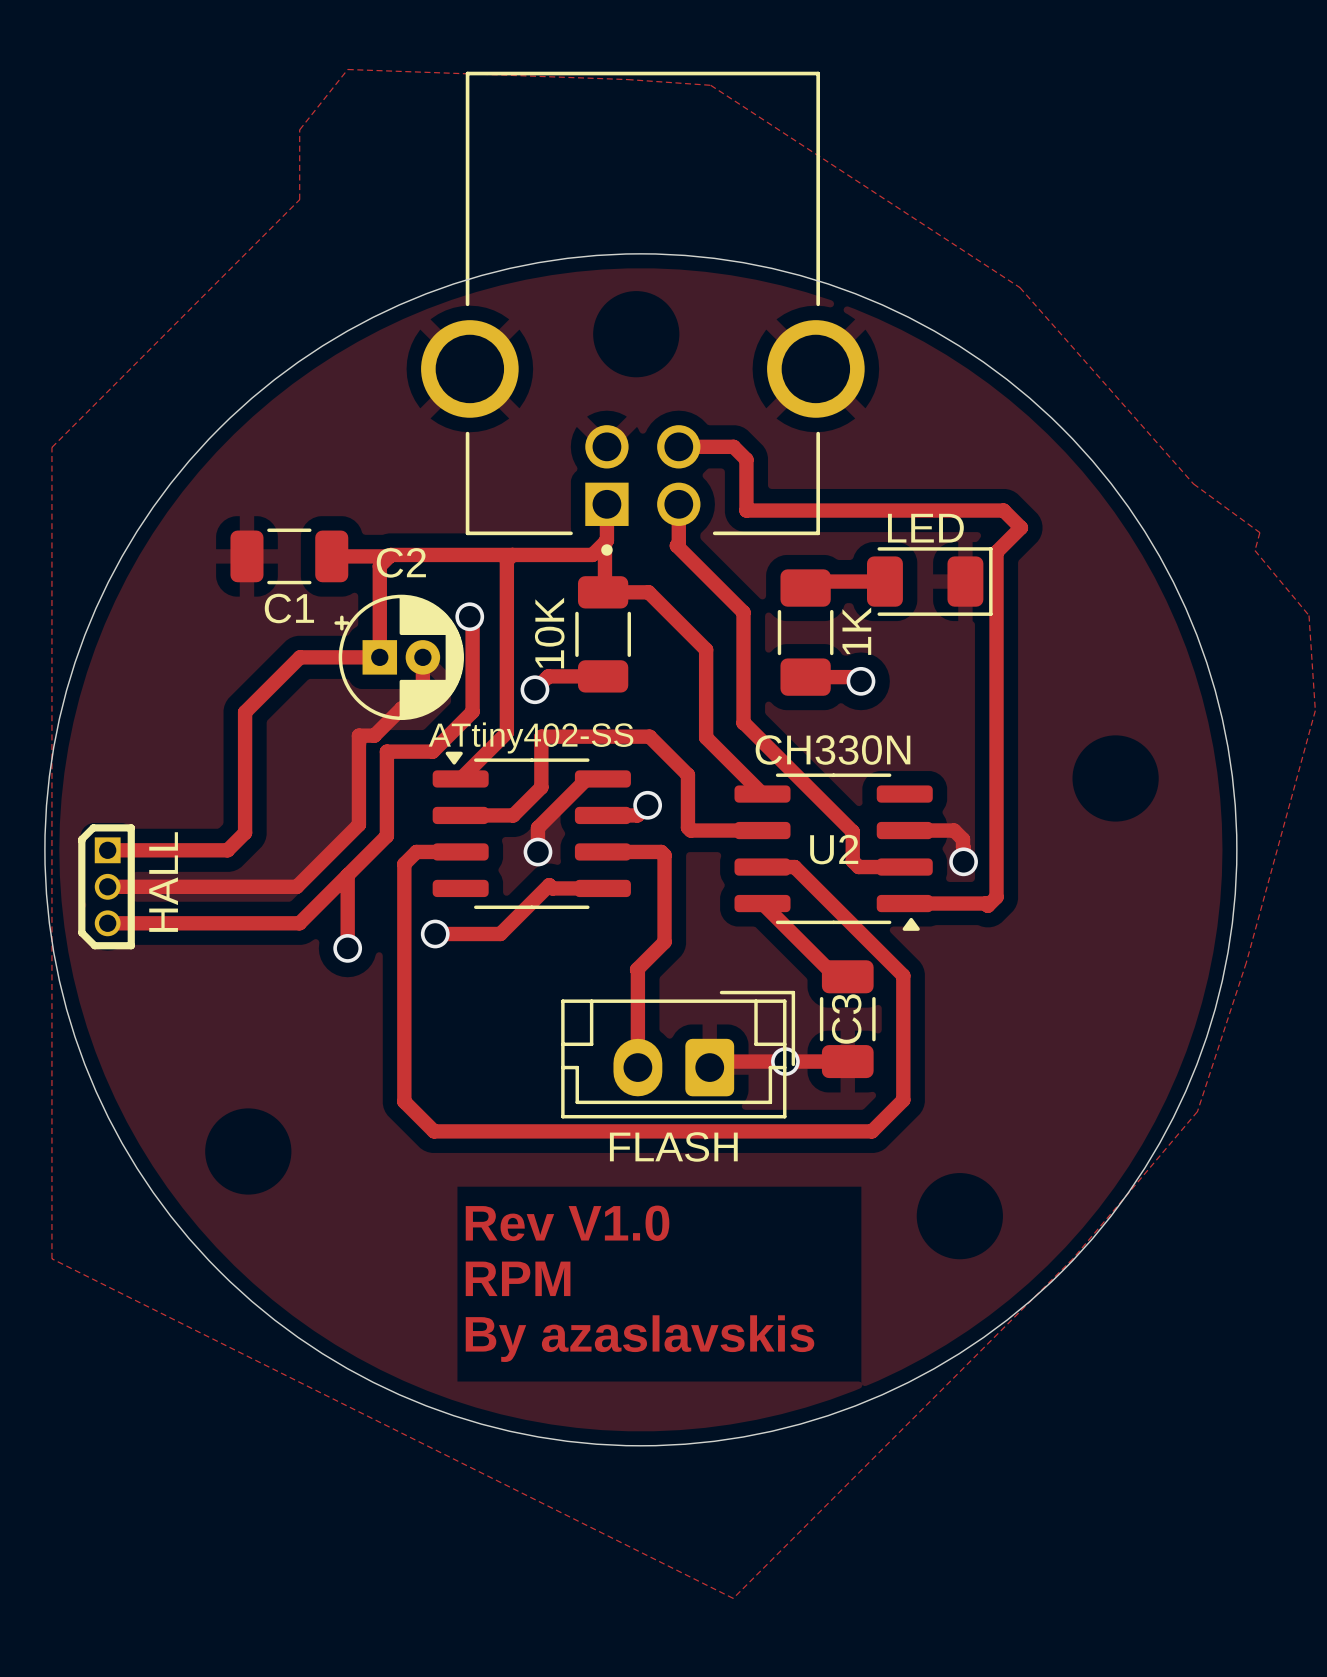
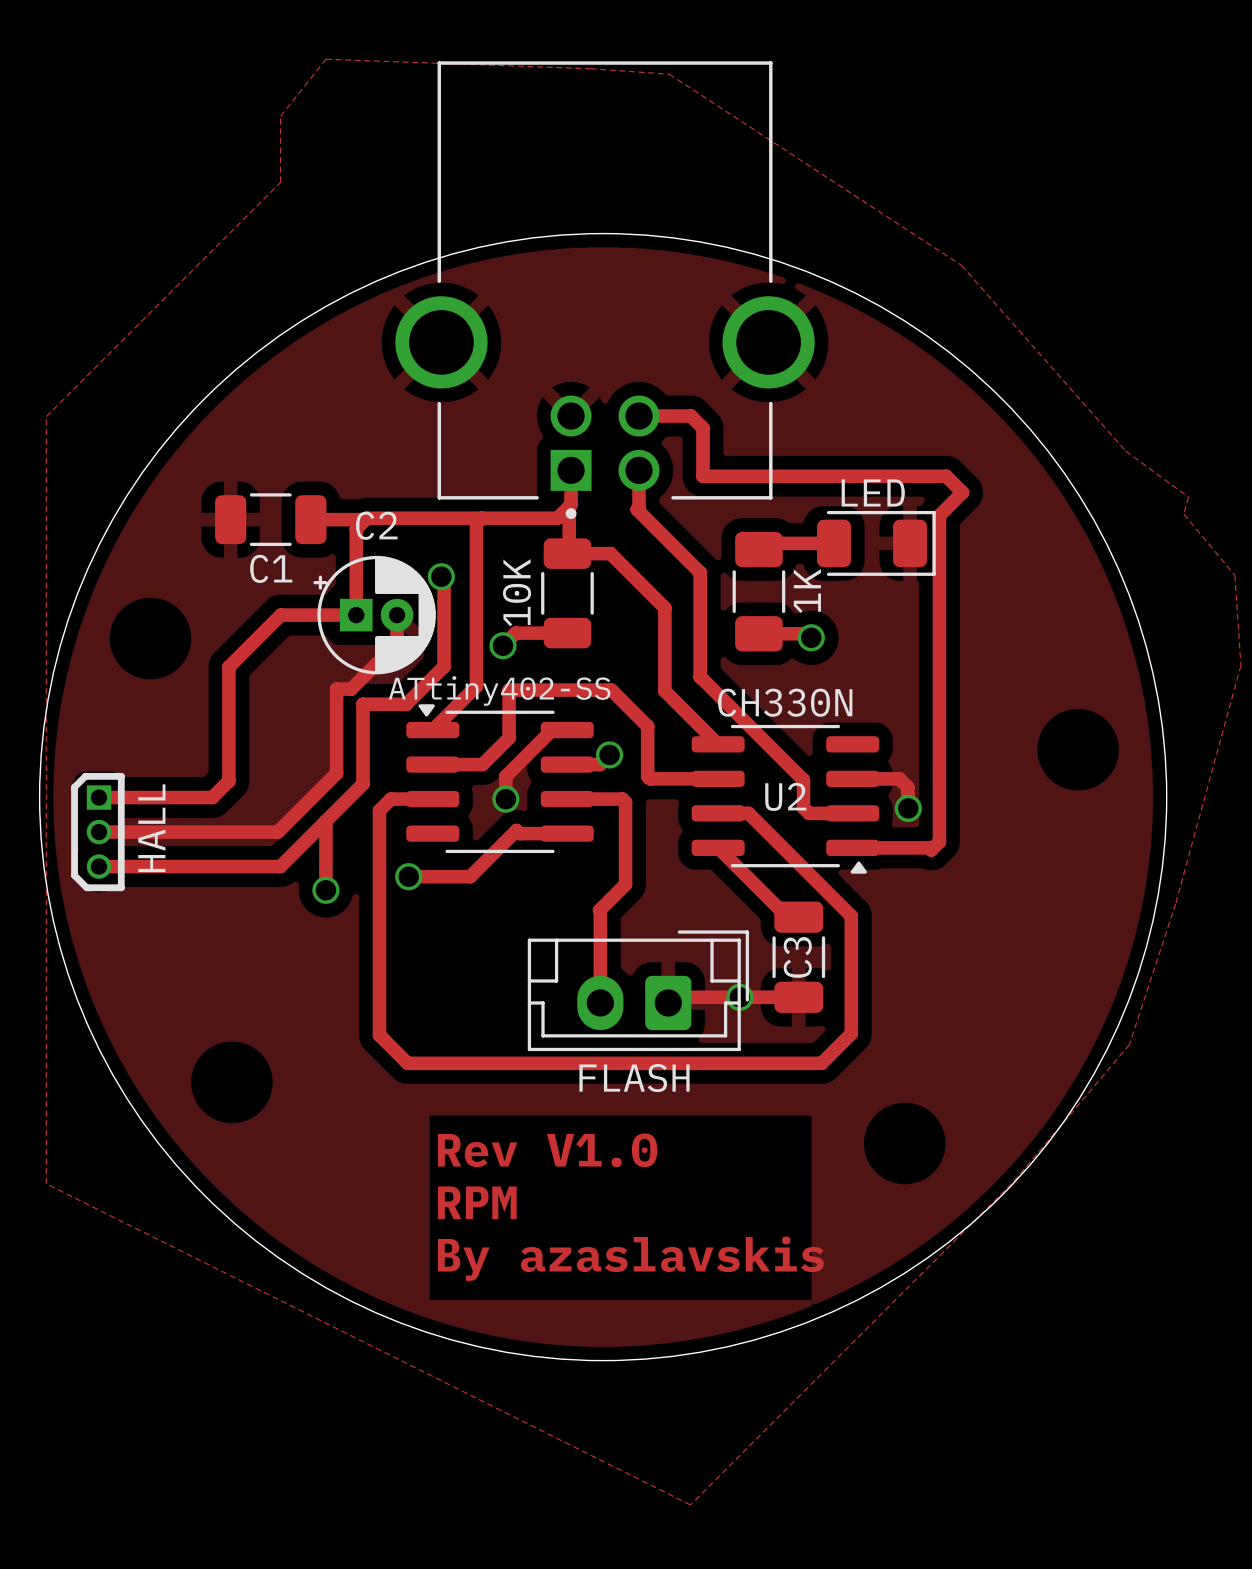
via: (636, 334) -> none
via: none -> (150, 638)
via position: (1115, 778) -> (1078, 749)

